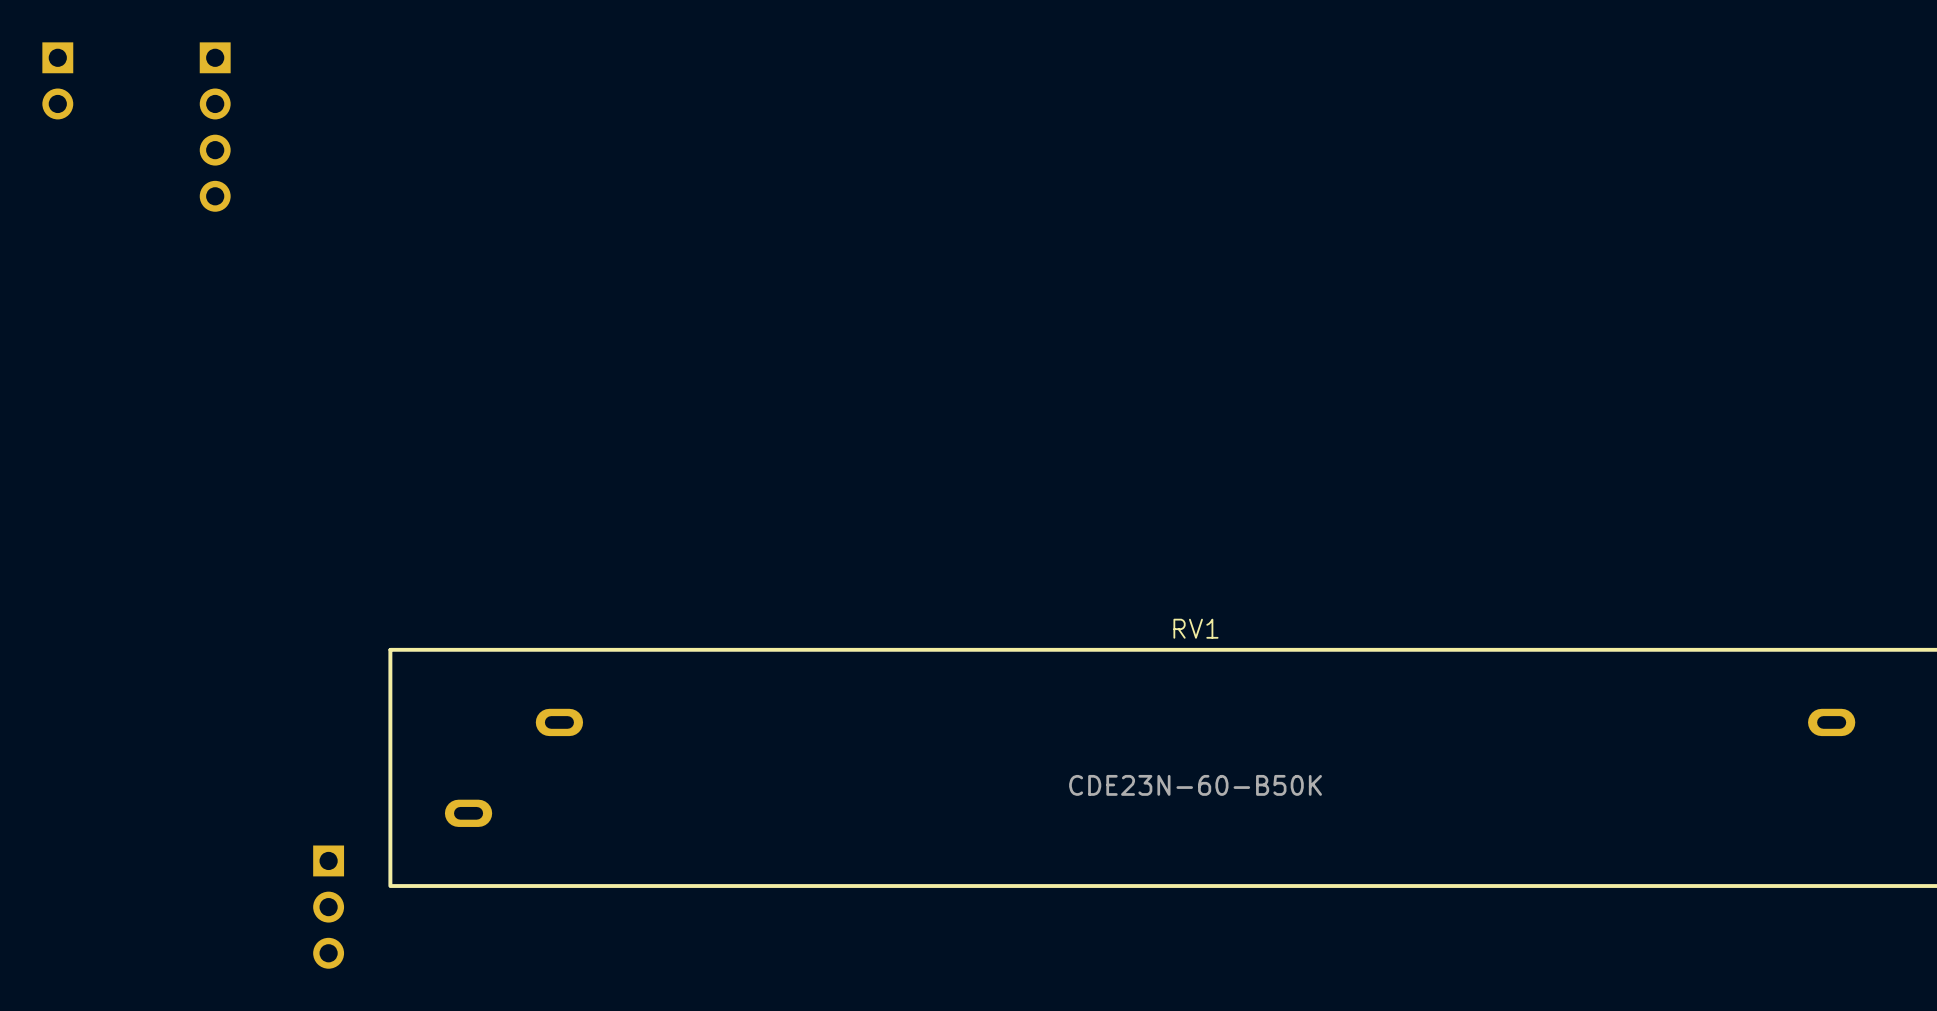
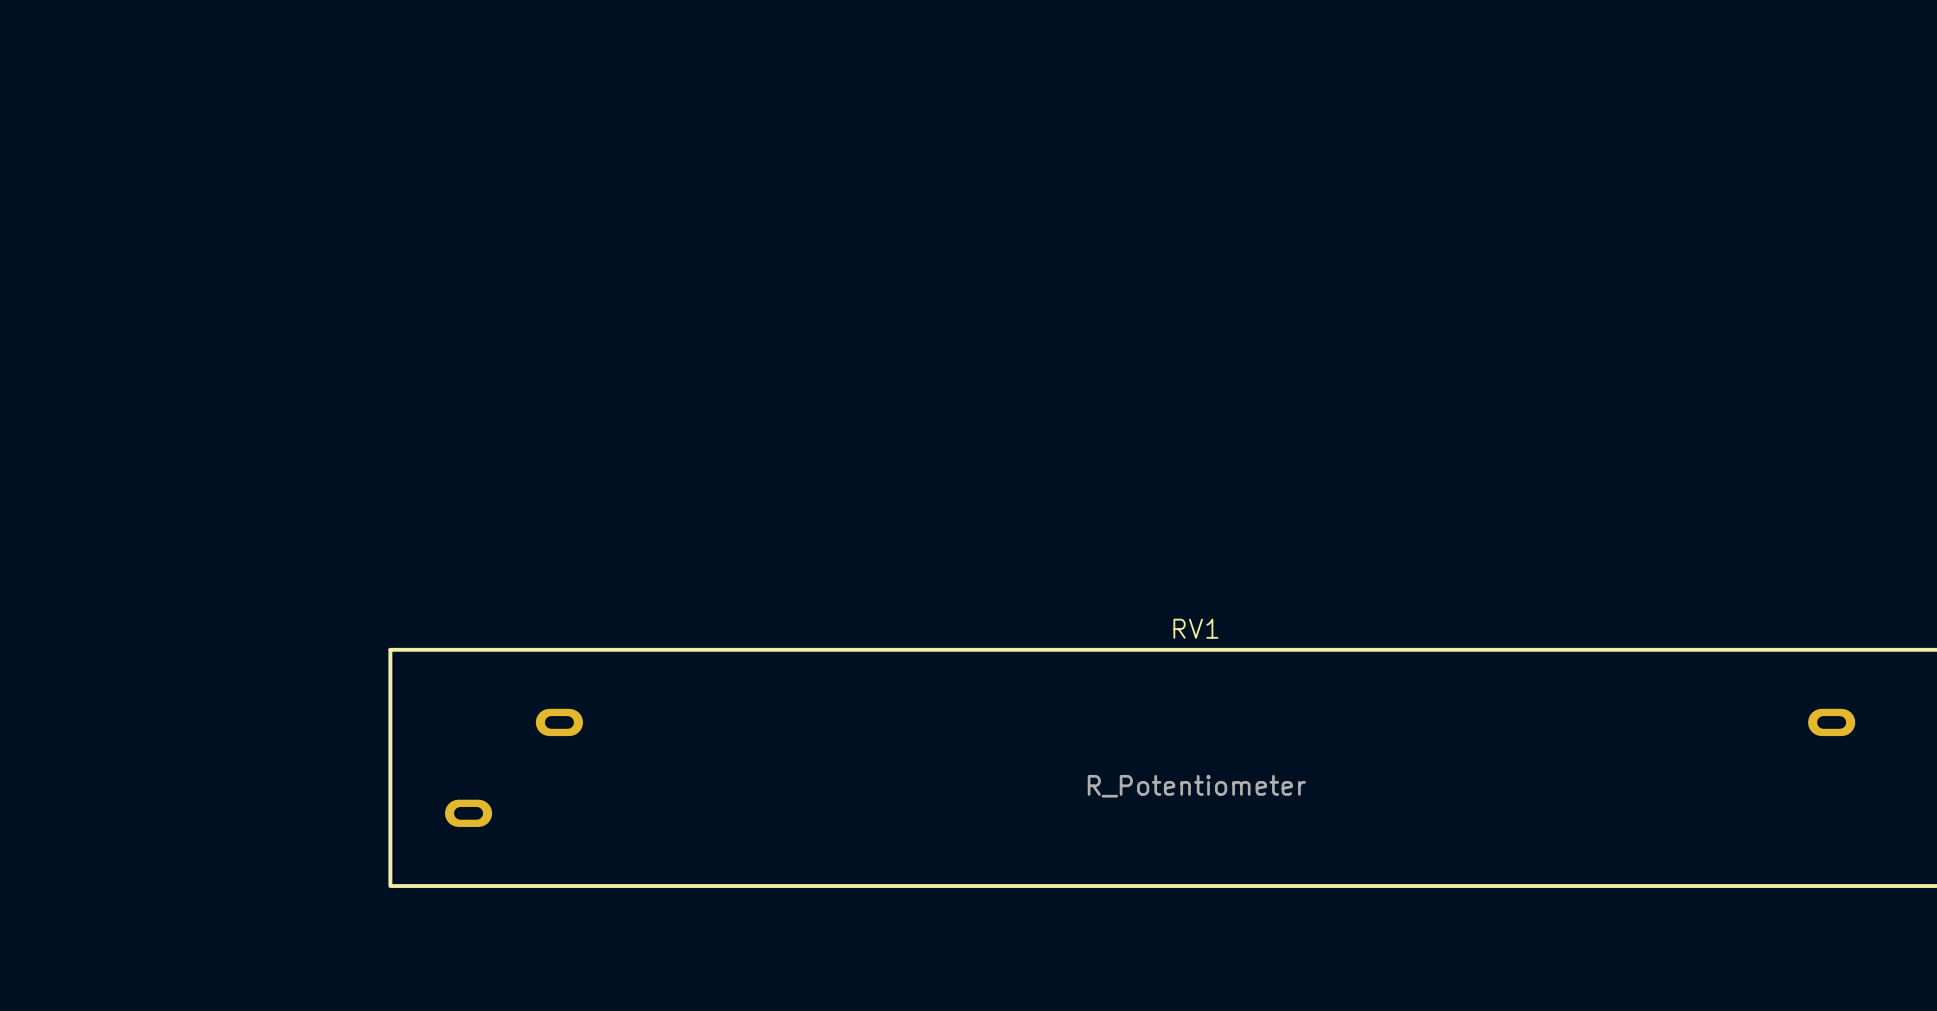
part: (57, 80) -> none
part: (215, 127) -> none
RV1 value: CDE23N-60-B50K (1195, 785) -> R_Potentiometer (1196, 786)
part: (328, 907) -> none

